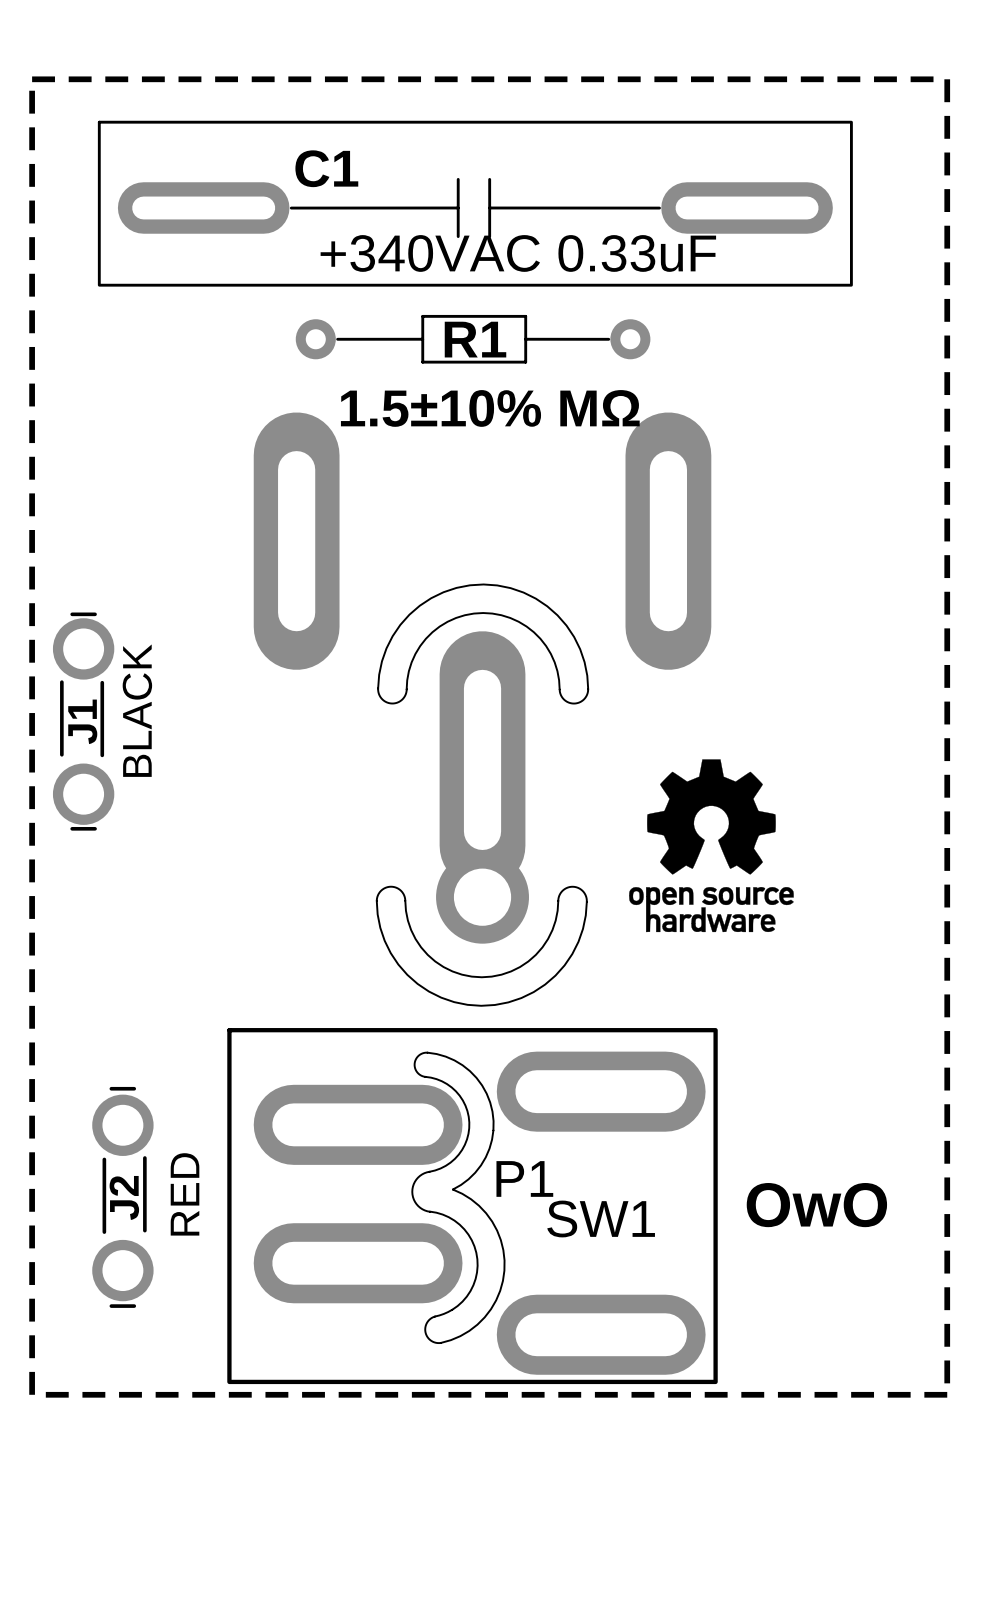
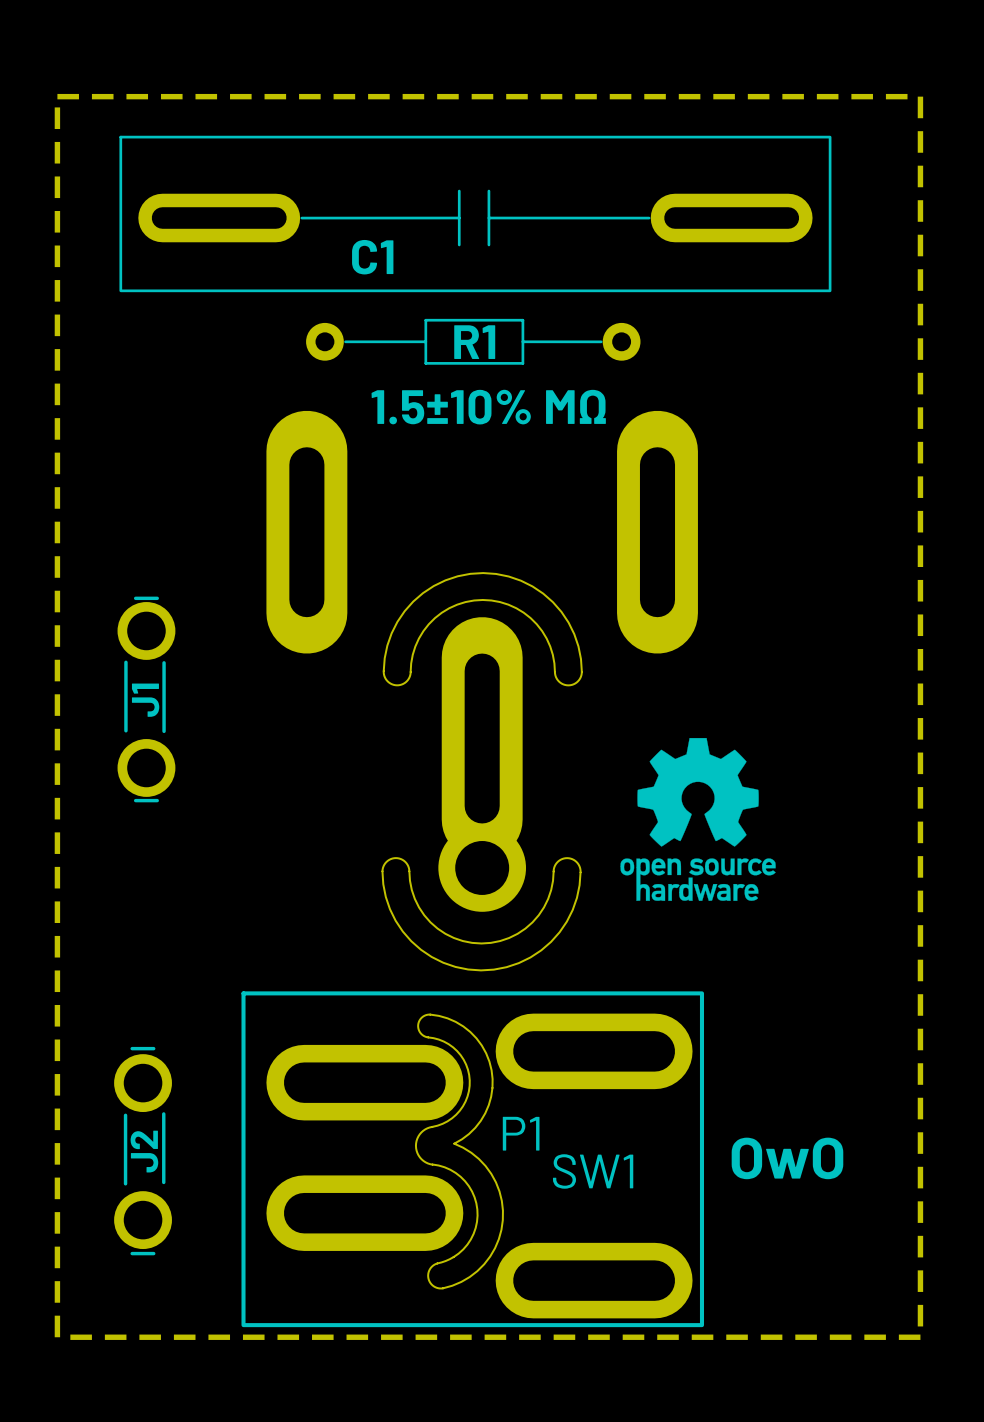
C1 name position: C1 (326, 168) -> C1 (372, 257)
C1 text: +340VAC 0.33uF (518, 253) -> none
text: BLACK (137, 710) -> none
J1 position: (83, 721) -> (146, 699)
text: RED (185, 1194) -> none

